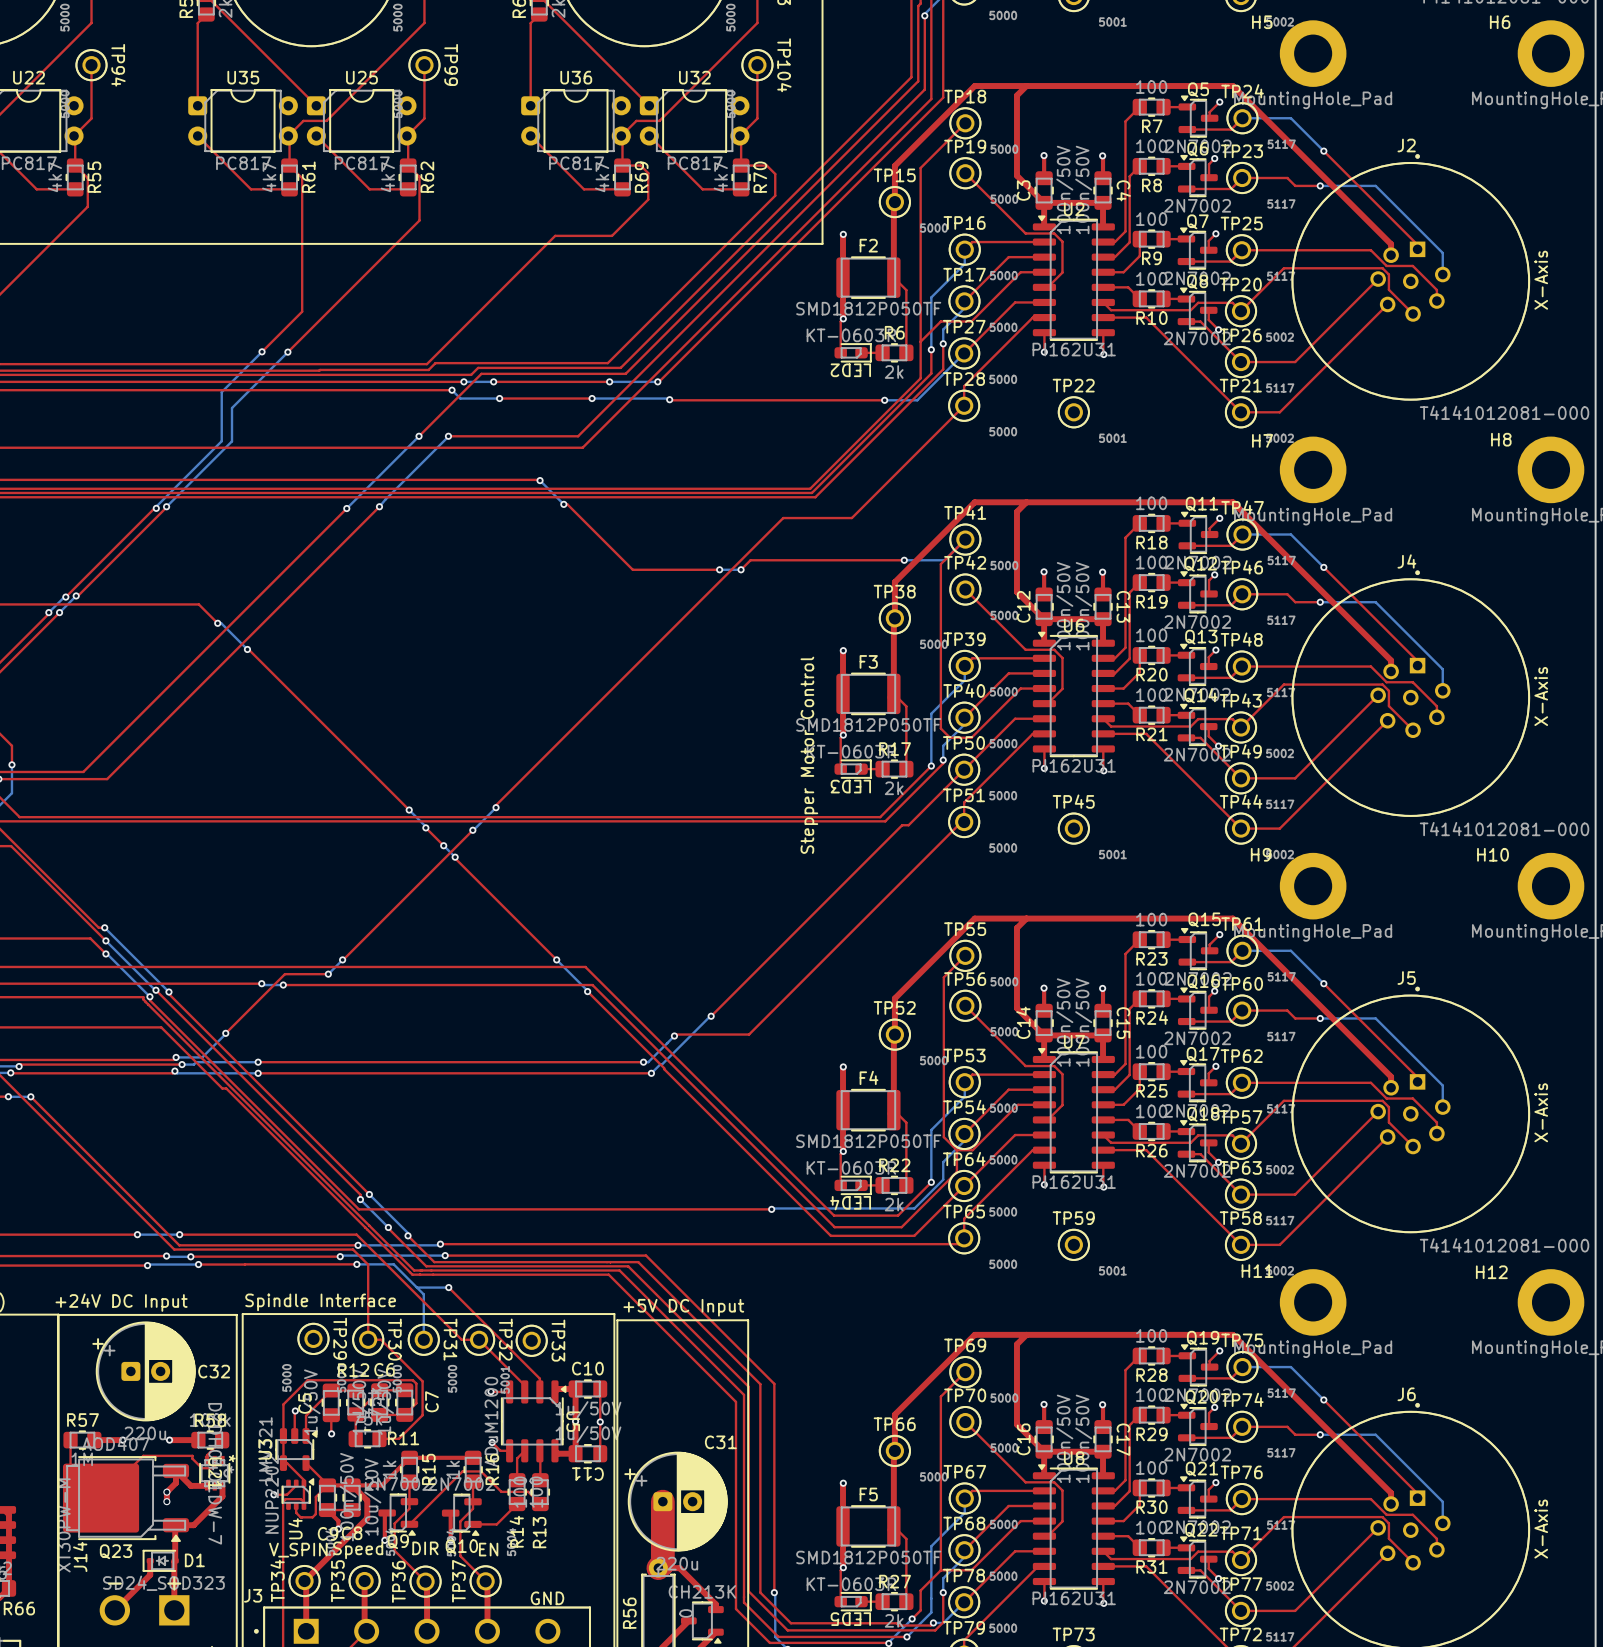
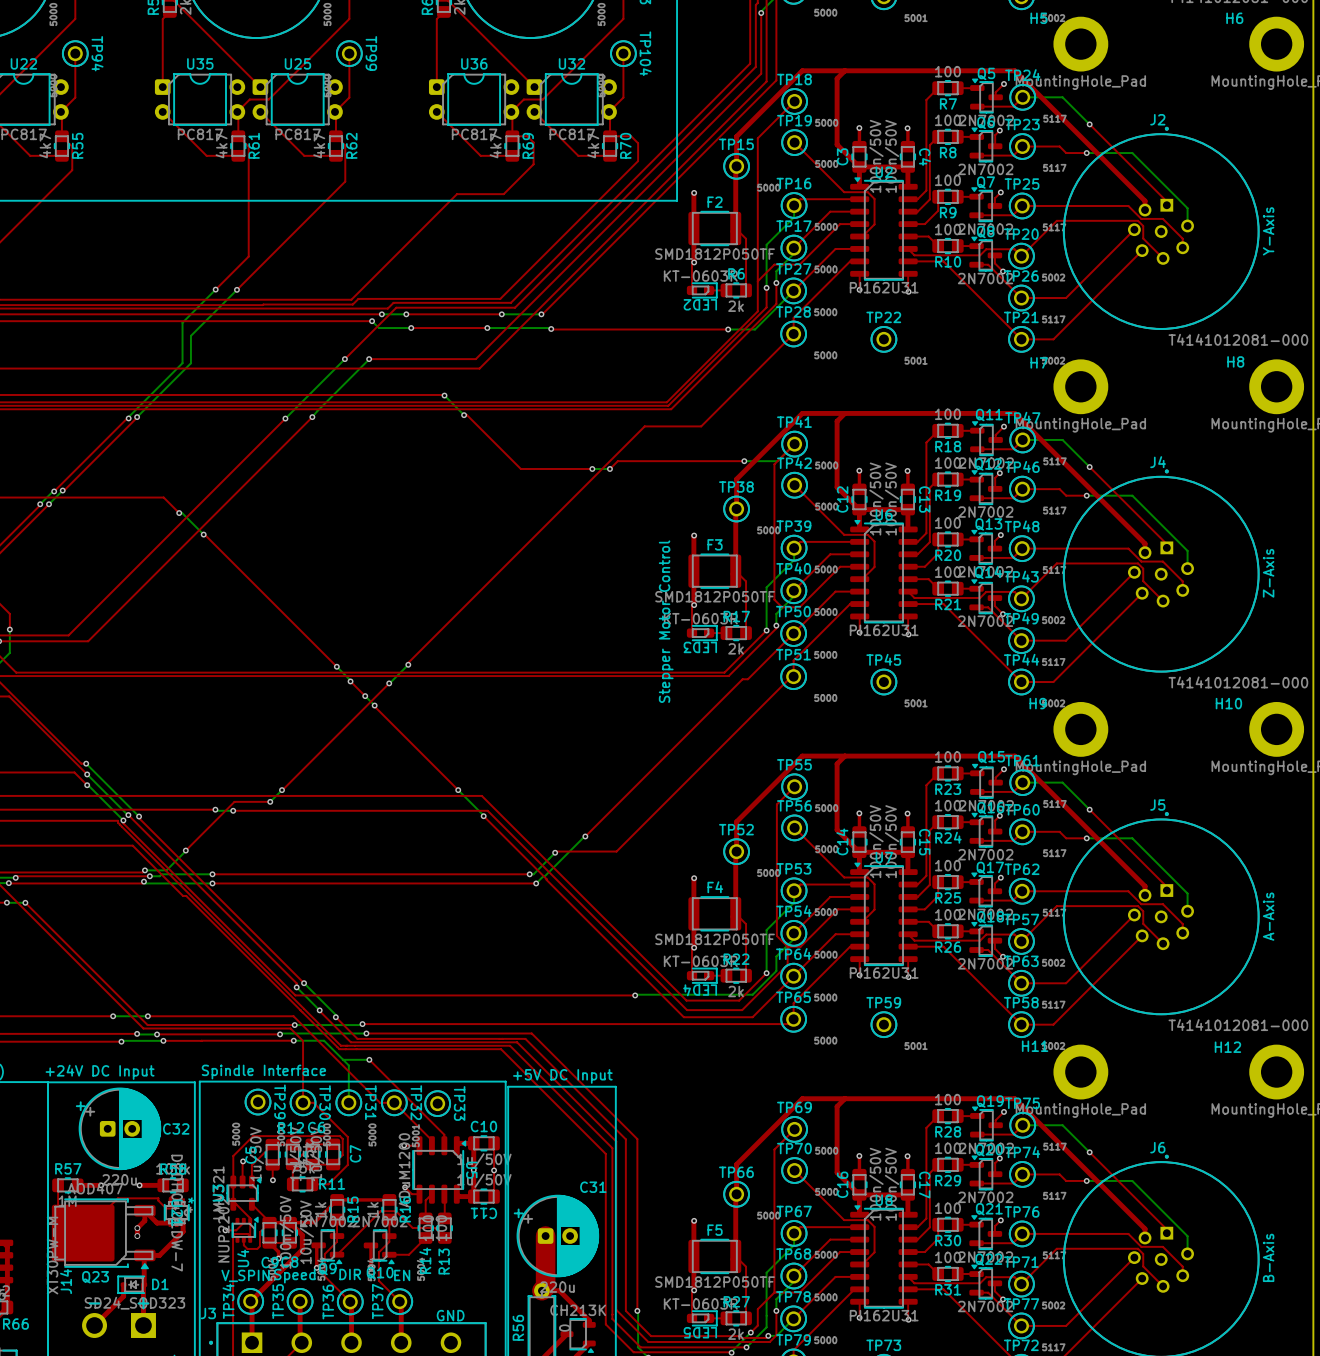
text: X-Axis (1541, 280) -> Y-Axis (1268, 231)
text: X-Axis (1541, 696) -> Z-Axis (1268, 573)
text: X-Axis (1541, 1112) -> A-Axis (1268, 916)
text: X-Axis (1541, 1529) -> B-Axis (1268, 1257)

